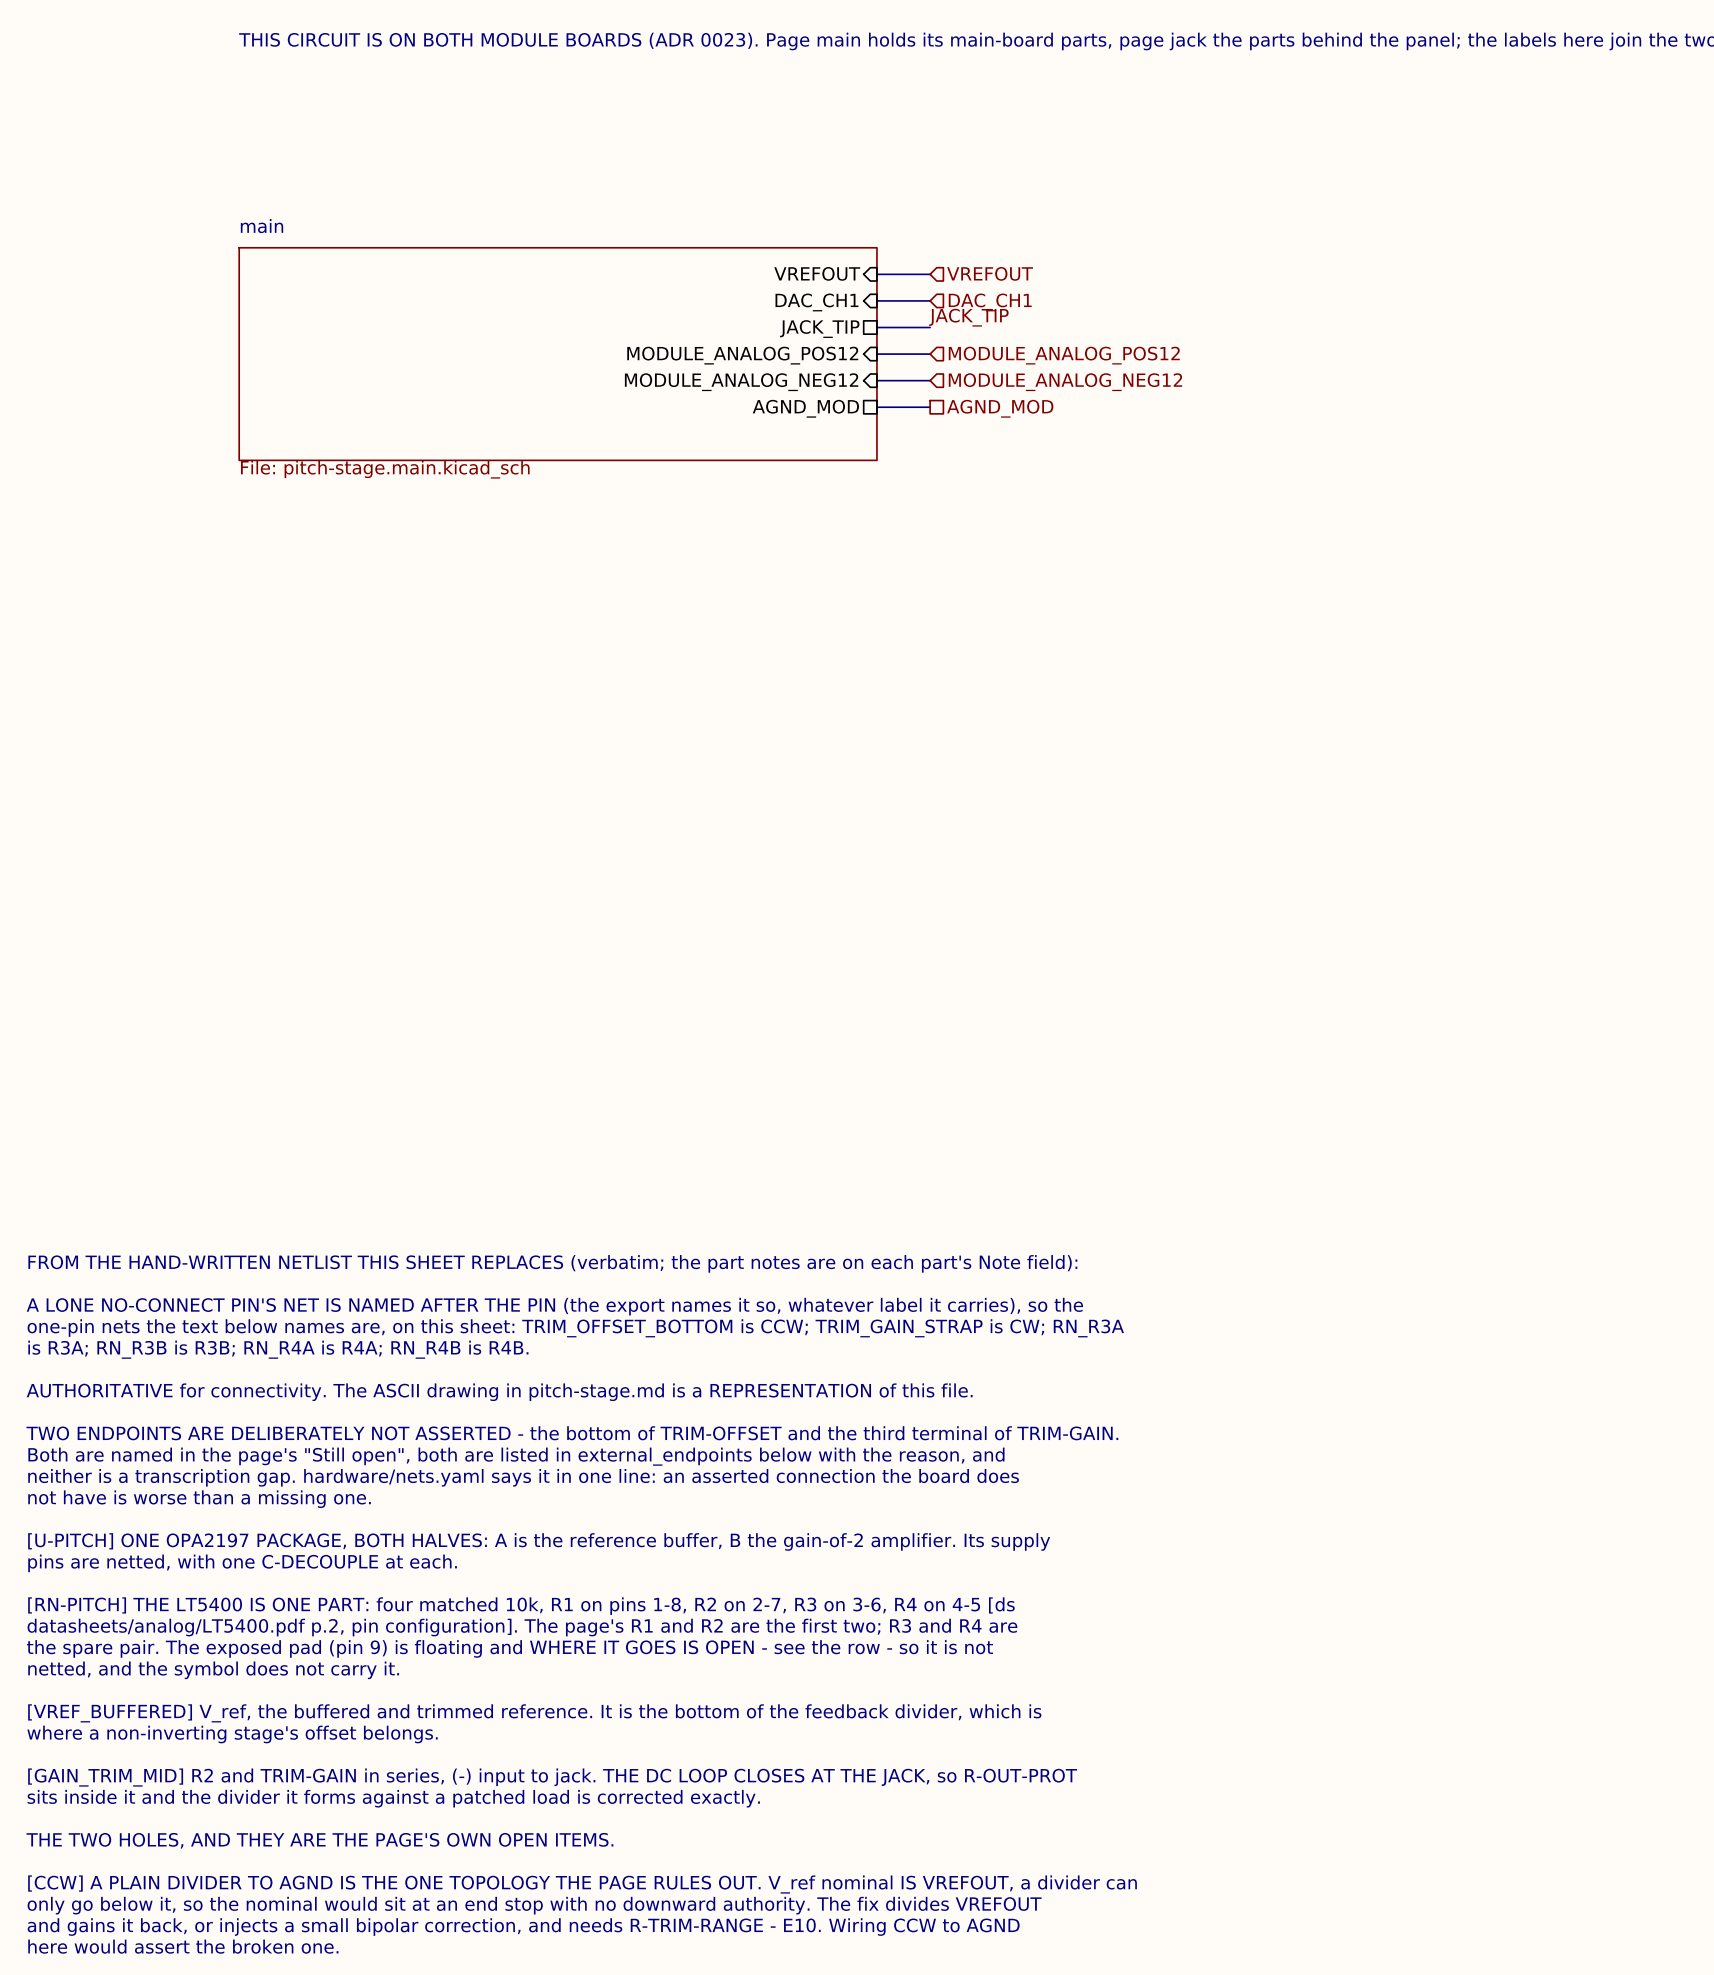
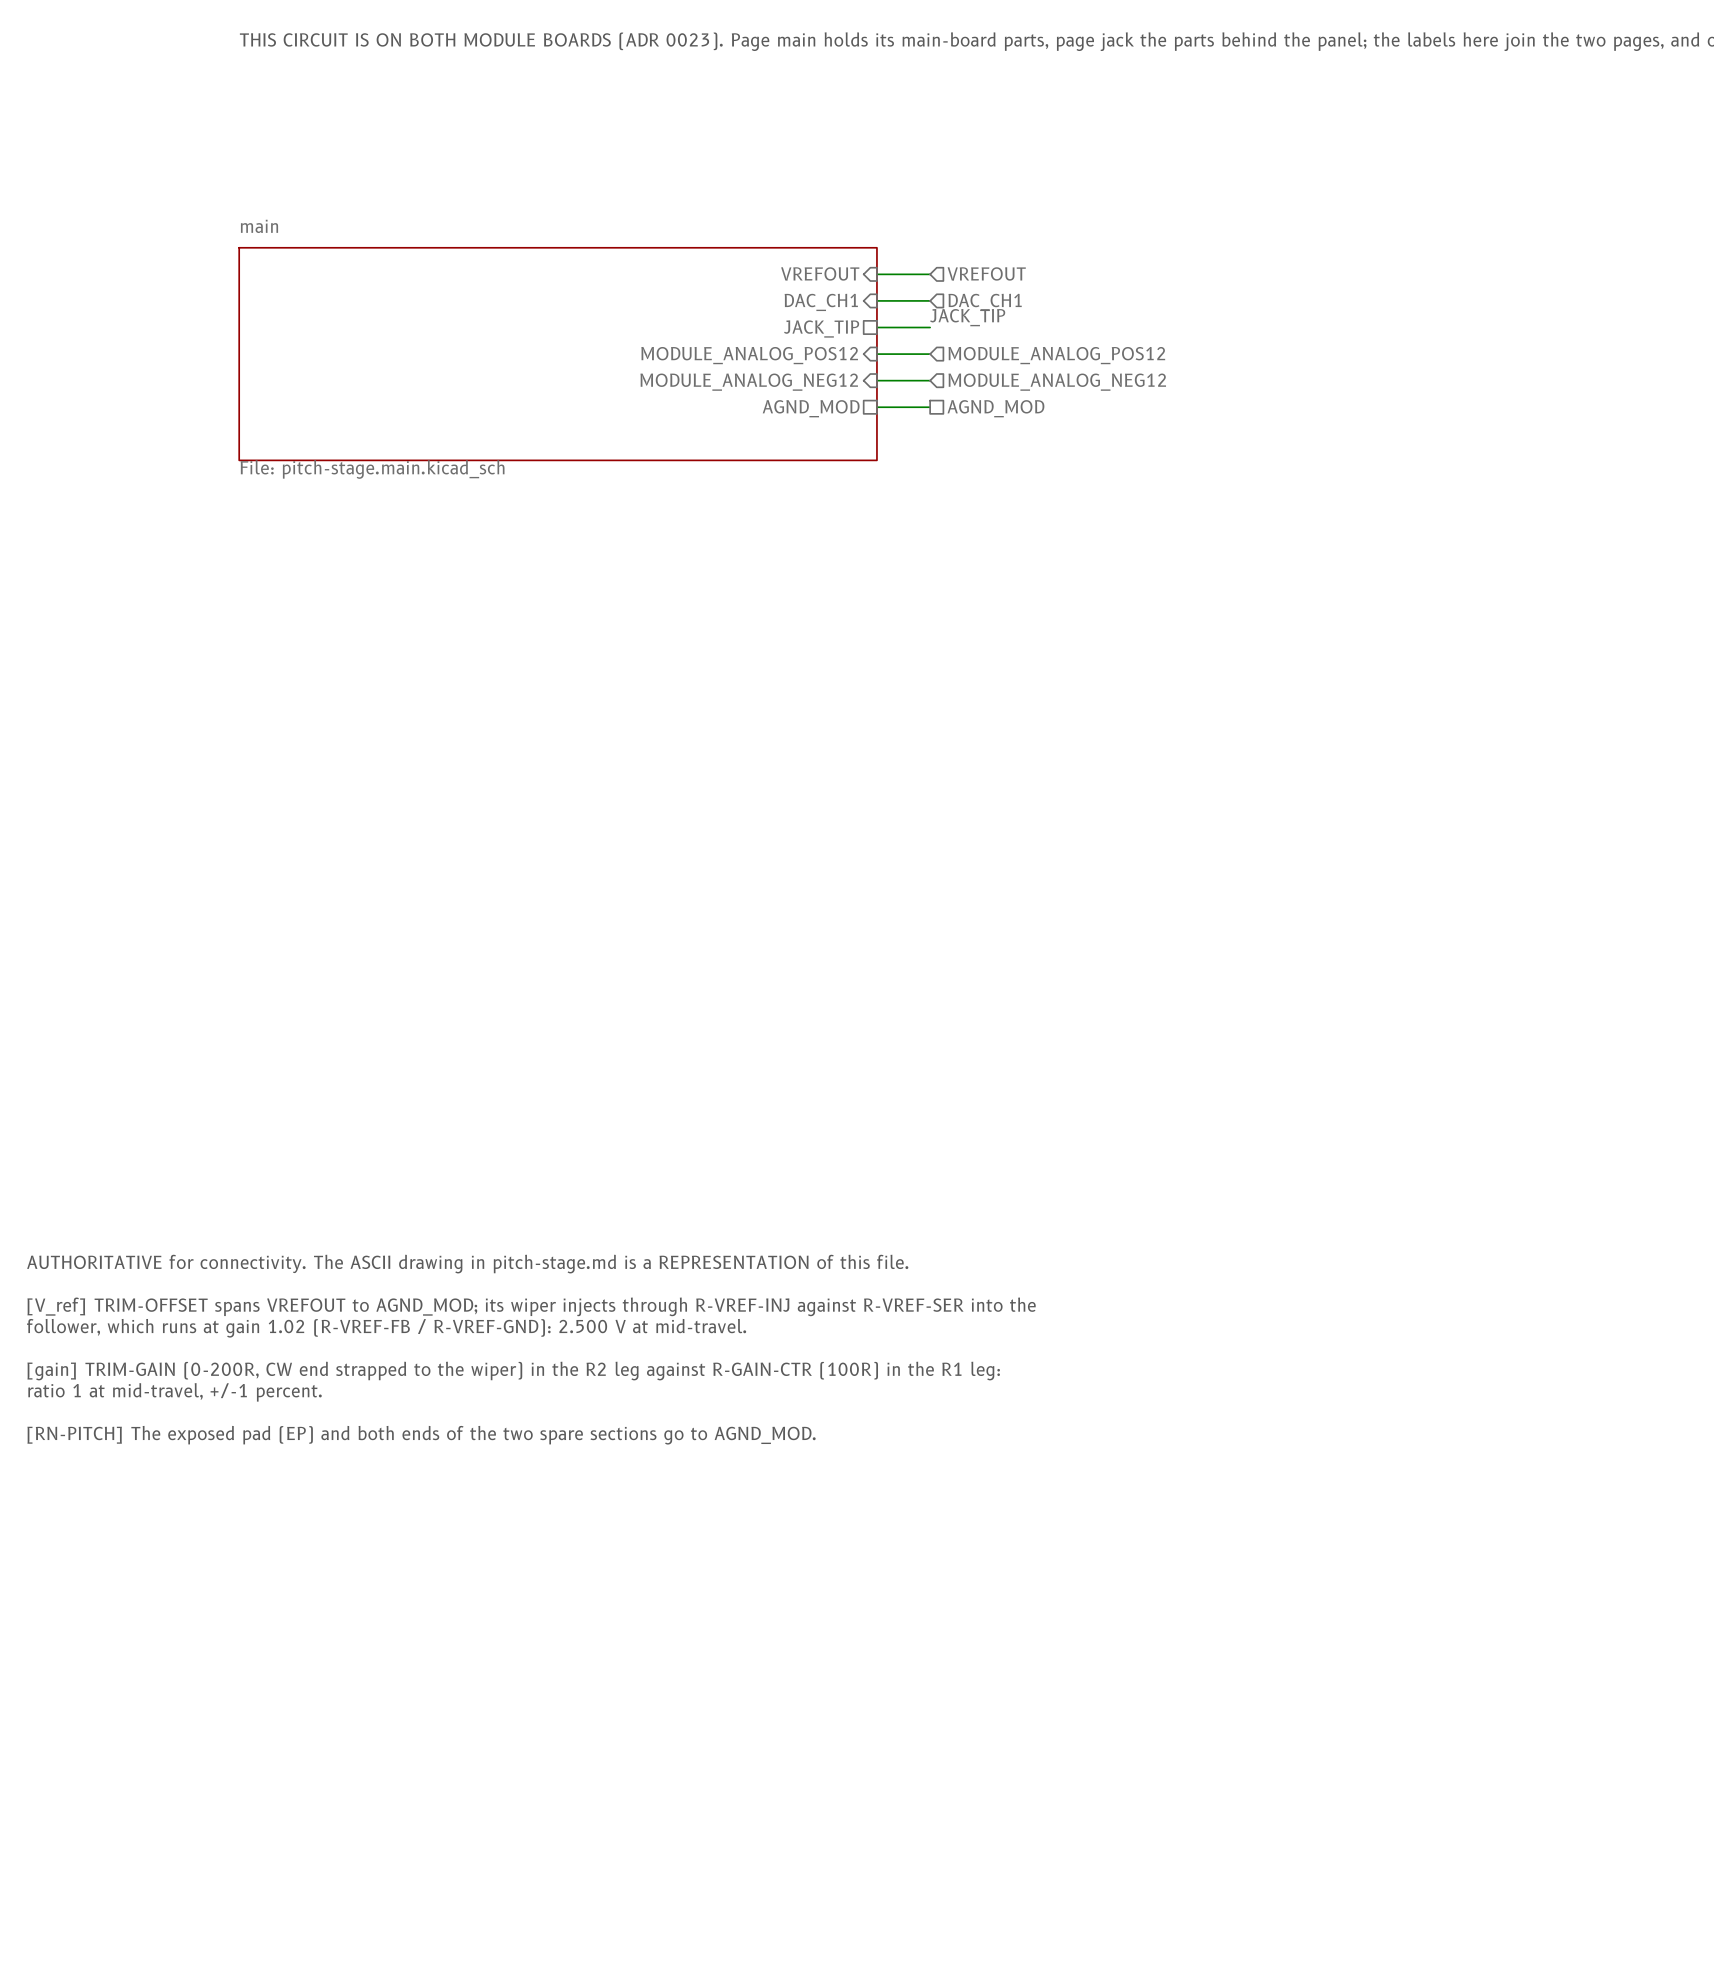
text: FROM THE HAND-WRITTEN NETLIST THIS SHEET REPLACES (verbatim; the part notes are on each part's Note field): (552, 1263) -> AUTHORITATIVE for connectivity. The ASCII drawing in pitch-stage.md is a REPRESENTATION of this file. (467, 1264)
text: A LONE NO-CONNECT PIN'S NET IS NAMED AFTER THE PIN (the export names it so, whatever label it carries), so the (554, 1306) -> [V_ref] TRIM-OFFSET spans VREFOUT to AGND_MOD; its wiper injects through R-VREF-INJ against R-VREF-SER into the (531, 1306)
text: one-pin nets the text below names are, on this sheet: TRIM_OFFSET_BOTTOM is CCW; TRIM_GAIN_STRAP is CW; RN_R3A (575, 1328) -> follower, which runs at gain 1.02 (R-VREF-FB / R-VREF-GND): 2.500 V at mid-travel. (386, 1328)
text: is R3A; RN_R3B is R3B; RN_R4A is R4A; RN_R4B is R4B. (278, 1349) -> none
text: none -> [gain] TRIM-GAIN (0-200R, CW end strapped to the wiper) in the R2 leg against R-GAIN-CTR (100R) in the R1 leg: (513, 1371)
text: AUTHORITATIVE for connectivity. The ASCII drawing in pitch-stage.md is a REPRESENTATION of this file. (499, 1392) -> ratio 1 at mid-travel, +/-1 percent. (175, 1392)
text: TWO ENDPOINTS ARE DELIBERATELY NOT ASSERTED - the bottom of TRIM-OFFSET and the third terminal of TRIM-GAIN. (572, 1433) -> [RN-PITCH] The exposed pad (EP) and both ends of the two spare sections go to AGND_MOD. (421, 1435)
text: Both are named in the page's "Still open", both are listed in external_endpoints below with the reason, and (516, 1456) -> none
text: neither is a transcription gap. hardware/nets.yaml says it in one line: an asserted connection the board does (523, 1477) -> none
text: not have is worse than a missing one. (199, 1499) -> none
text: [U-PITCH] ONE OPA2197 PACKAGE, BOTH HALVES: A is the reference buffer, B the gain-of-2 amplifier. Its supply (539, 1541) -> none
text: pins are netted, with one C-DECOUPLE at each. (242, 1563) -> none
text: [RN-PITCH] THE LT5400 IS ONE PART: four matched 10k, R1 on pins 1-8, R2 on 2-7, R3 on 3-6, R4 on 4-5 [ds (521, 1606) -> none
text: datasheets/analog/LT5400.pdf p.2, pin configuration]. The page's R1 and R2 are the first two; R3 and R4 are (522, 1627) -> none
text: the spare pair. The exposed pad (pin 9) is floating and WHERE IT GOES IS OPEN - see the row - so it is not (510, 1648) -> none
text: netted, and the symbol does not carry it. (213, 1670) -> none
text: [VREF_BUFFERED] V_ref, the buffered and trimmed reference. It is the bottom of the feedback divider, which is (534, 1713) -> none
text: where a non-inverting stage's offset belongs. (232, 1734) -> none
text: [GAIN_TRIM_MID] R2 and TRIM-GAIN in series, (-) input to jack. THE DC LOOP CLOSES AT THE JACK, so R-OUT-PROT (552, 1777) -> none
text: sits inside it and the divider it forms against a patched load is corrected exactly. (393, 1798) -> none
text: THE TWO HOLES, AND THEY ARE THE PAGE'S OWN OPEN ITEMS. (319, 1840) -> none
text: [CCW] A PLAIN DIVIDER TO AGND IS THE ONE TOPOLOGY THE PAGE RULES OUT. V_ref nominal IS VREFOUT, a divider can (582, 1884) -> none
text: only go below it, so the nominal would sit at an end stop with no downward authority. The fix divides VREFOUT (534, 1905) -> none
text: and gains it back, or injects a small bipolar correction, and needs R-TRIM-RANGE - E10. Wiring CCW to AGND (523, 1927) -> none
text: here would assert the broken one. (183, 1946) -> none

